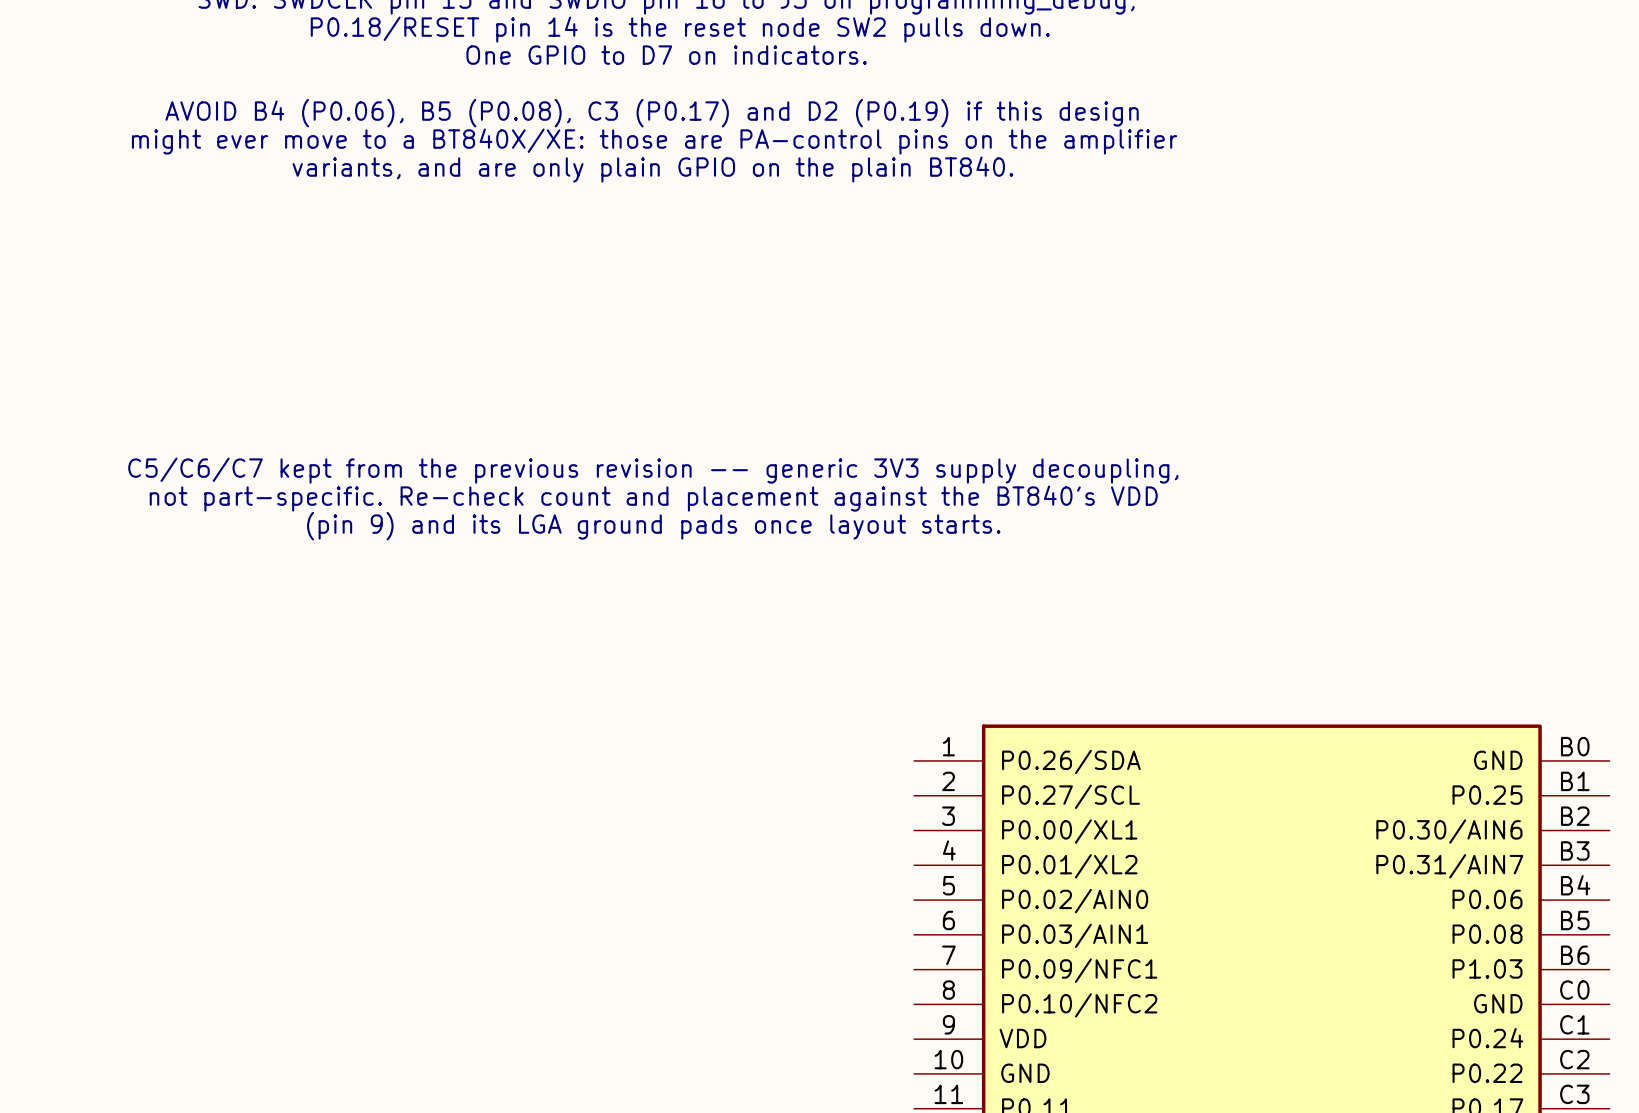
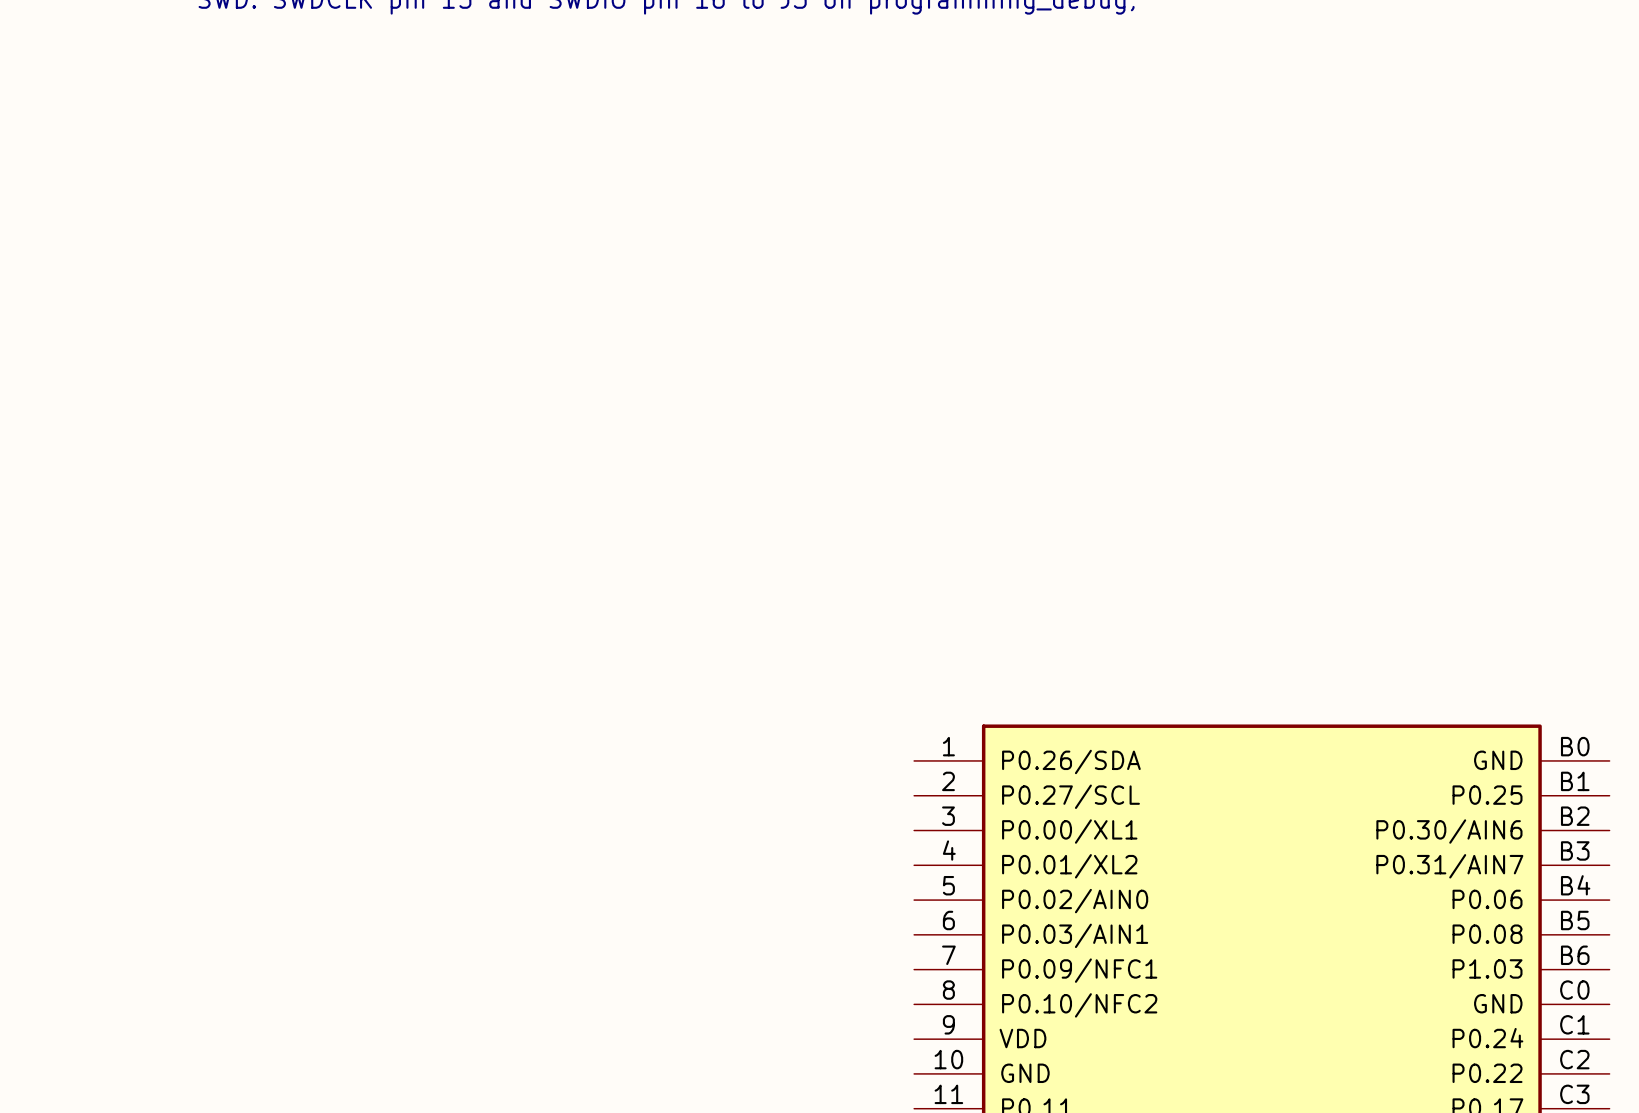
text: P0.18/RESET pin 14 is the reset node SW2 pulls down. (680, 29) -> none
text: One GPIO to D7 on indicators. (666, 55) -> none
text: AVOID B4 (P0.06), B5 (P0.08), C3 (P0.17) and D2 (P0.19) if this design (652, 113) -> none
text: might ever move to a BT840X/XE: those are PA-control pins on the amplifier (654, 141) -> none
text: variants, and are only plain GPIO on the plain BT840. (652, 169) -> none
text: C5/C6/C7 kept from the previous revision -- generic 3V3 supply decoupling, (653, 470) -> none
text: not part-specific. Re-check count and placement against the BT840's VDD (653, 498) -> none
text: (pin 9) and its LGA ground pads once layout starts. (653, 526) -> none

